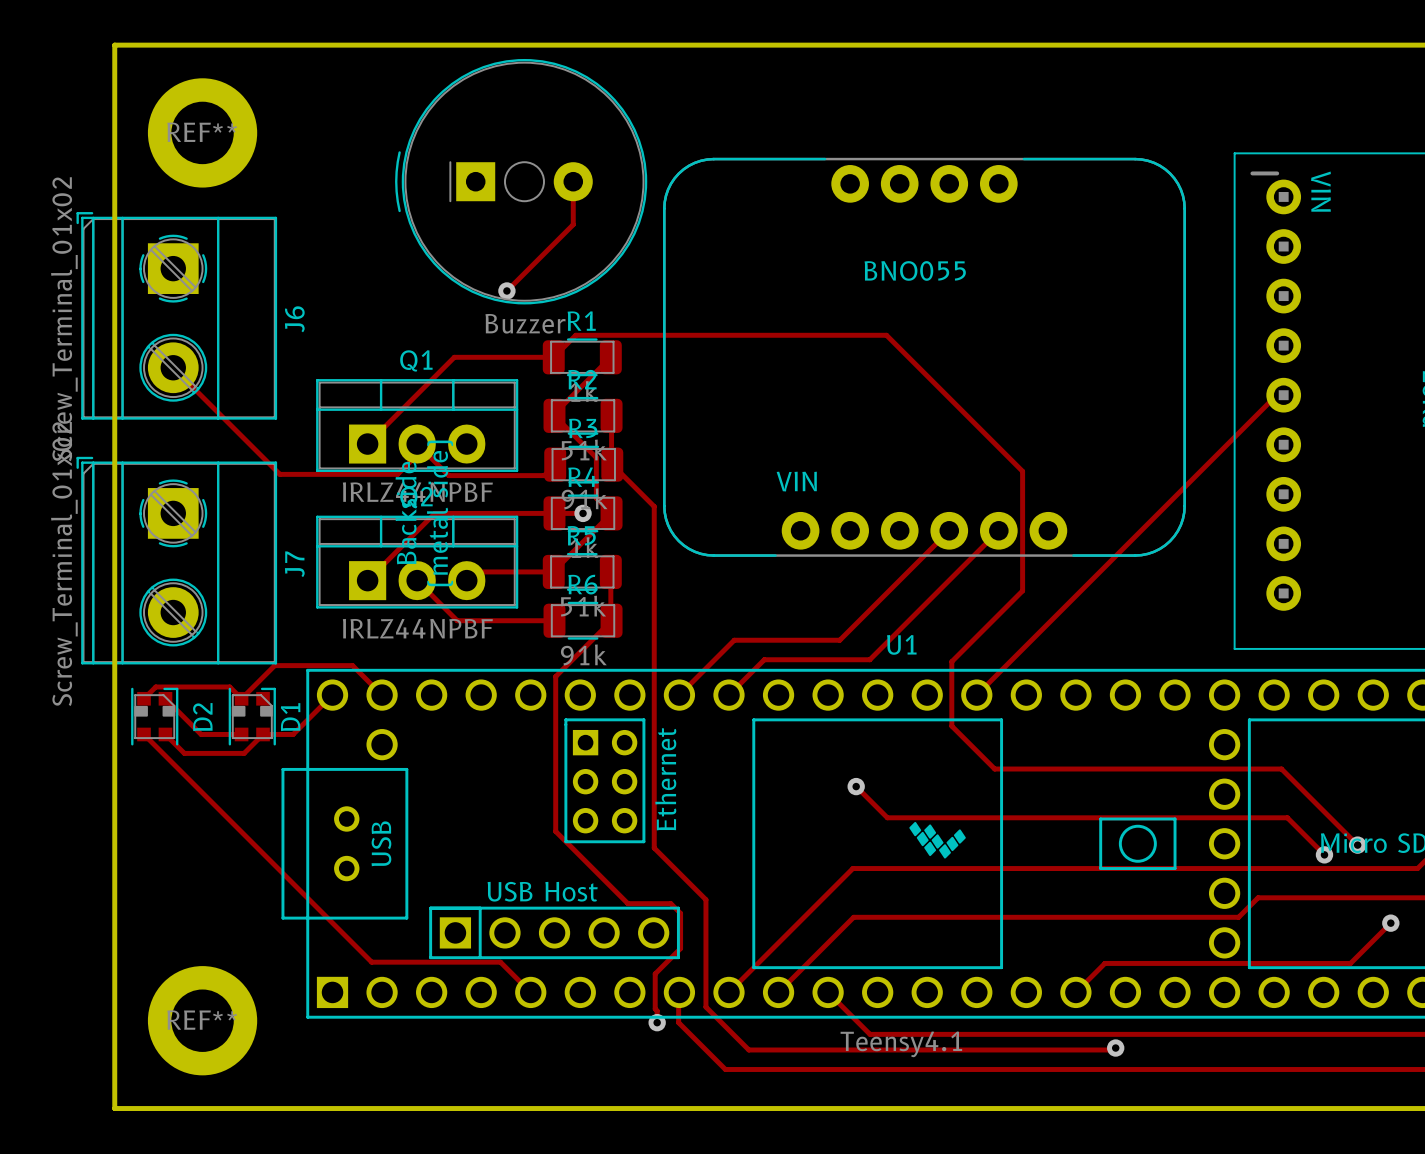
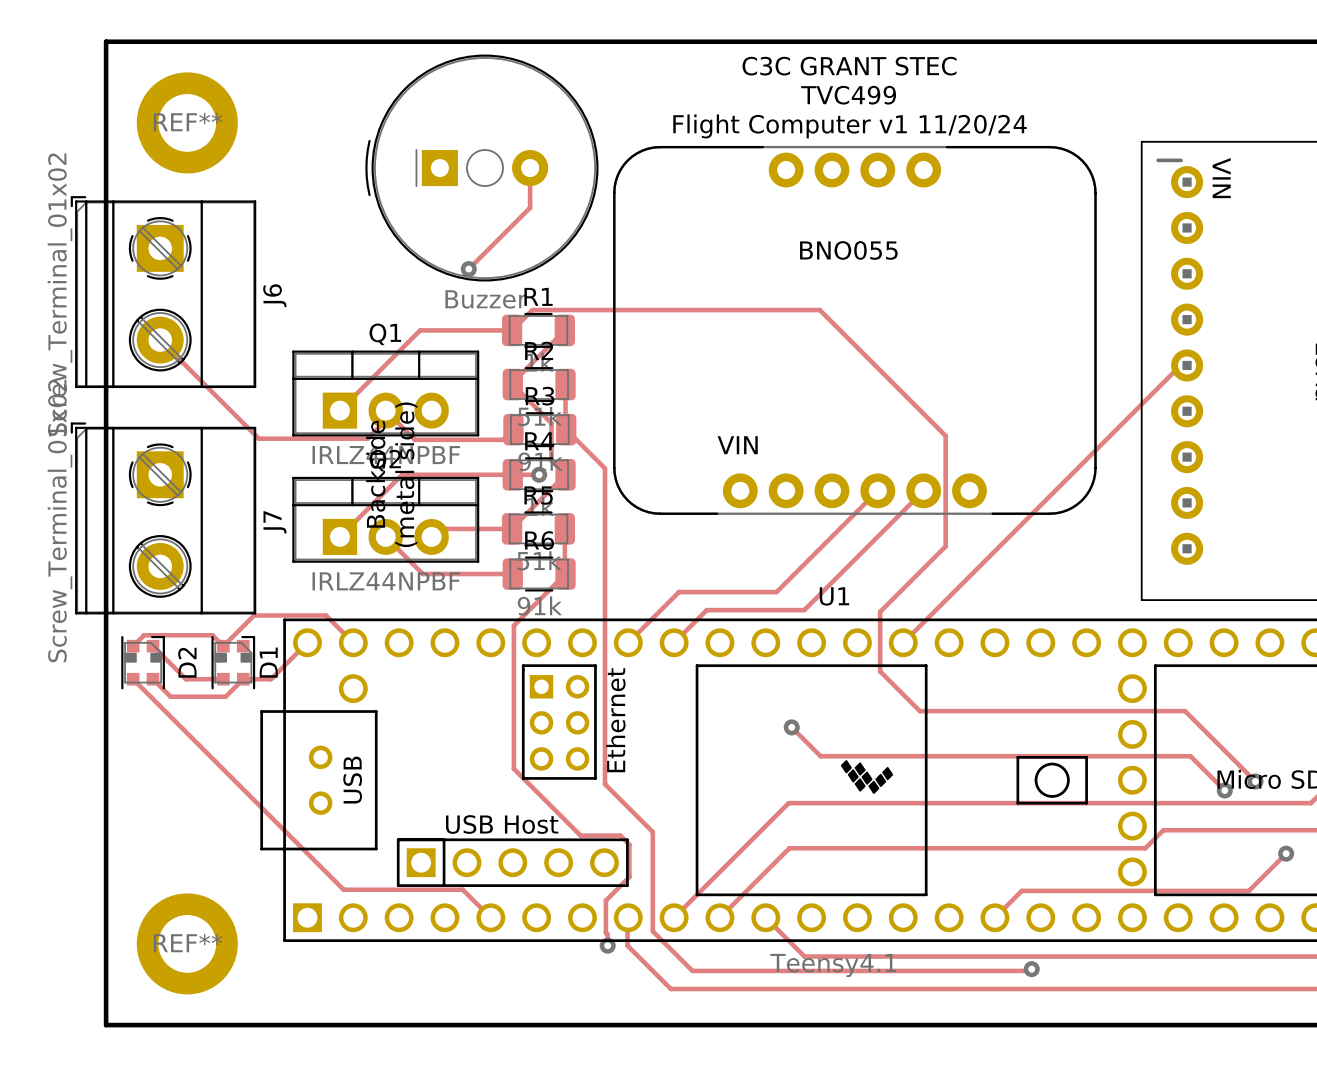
text: none -> C3C GRANT STEC (849, 66)
text: none -> TVC499 (848, 95)
text: none -> Flight Computer v1 11/20/24 (850, 126)

